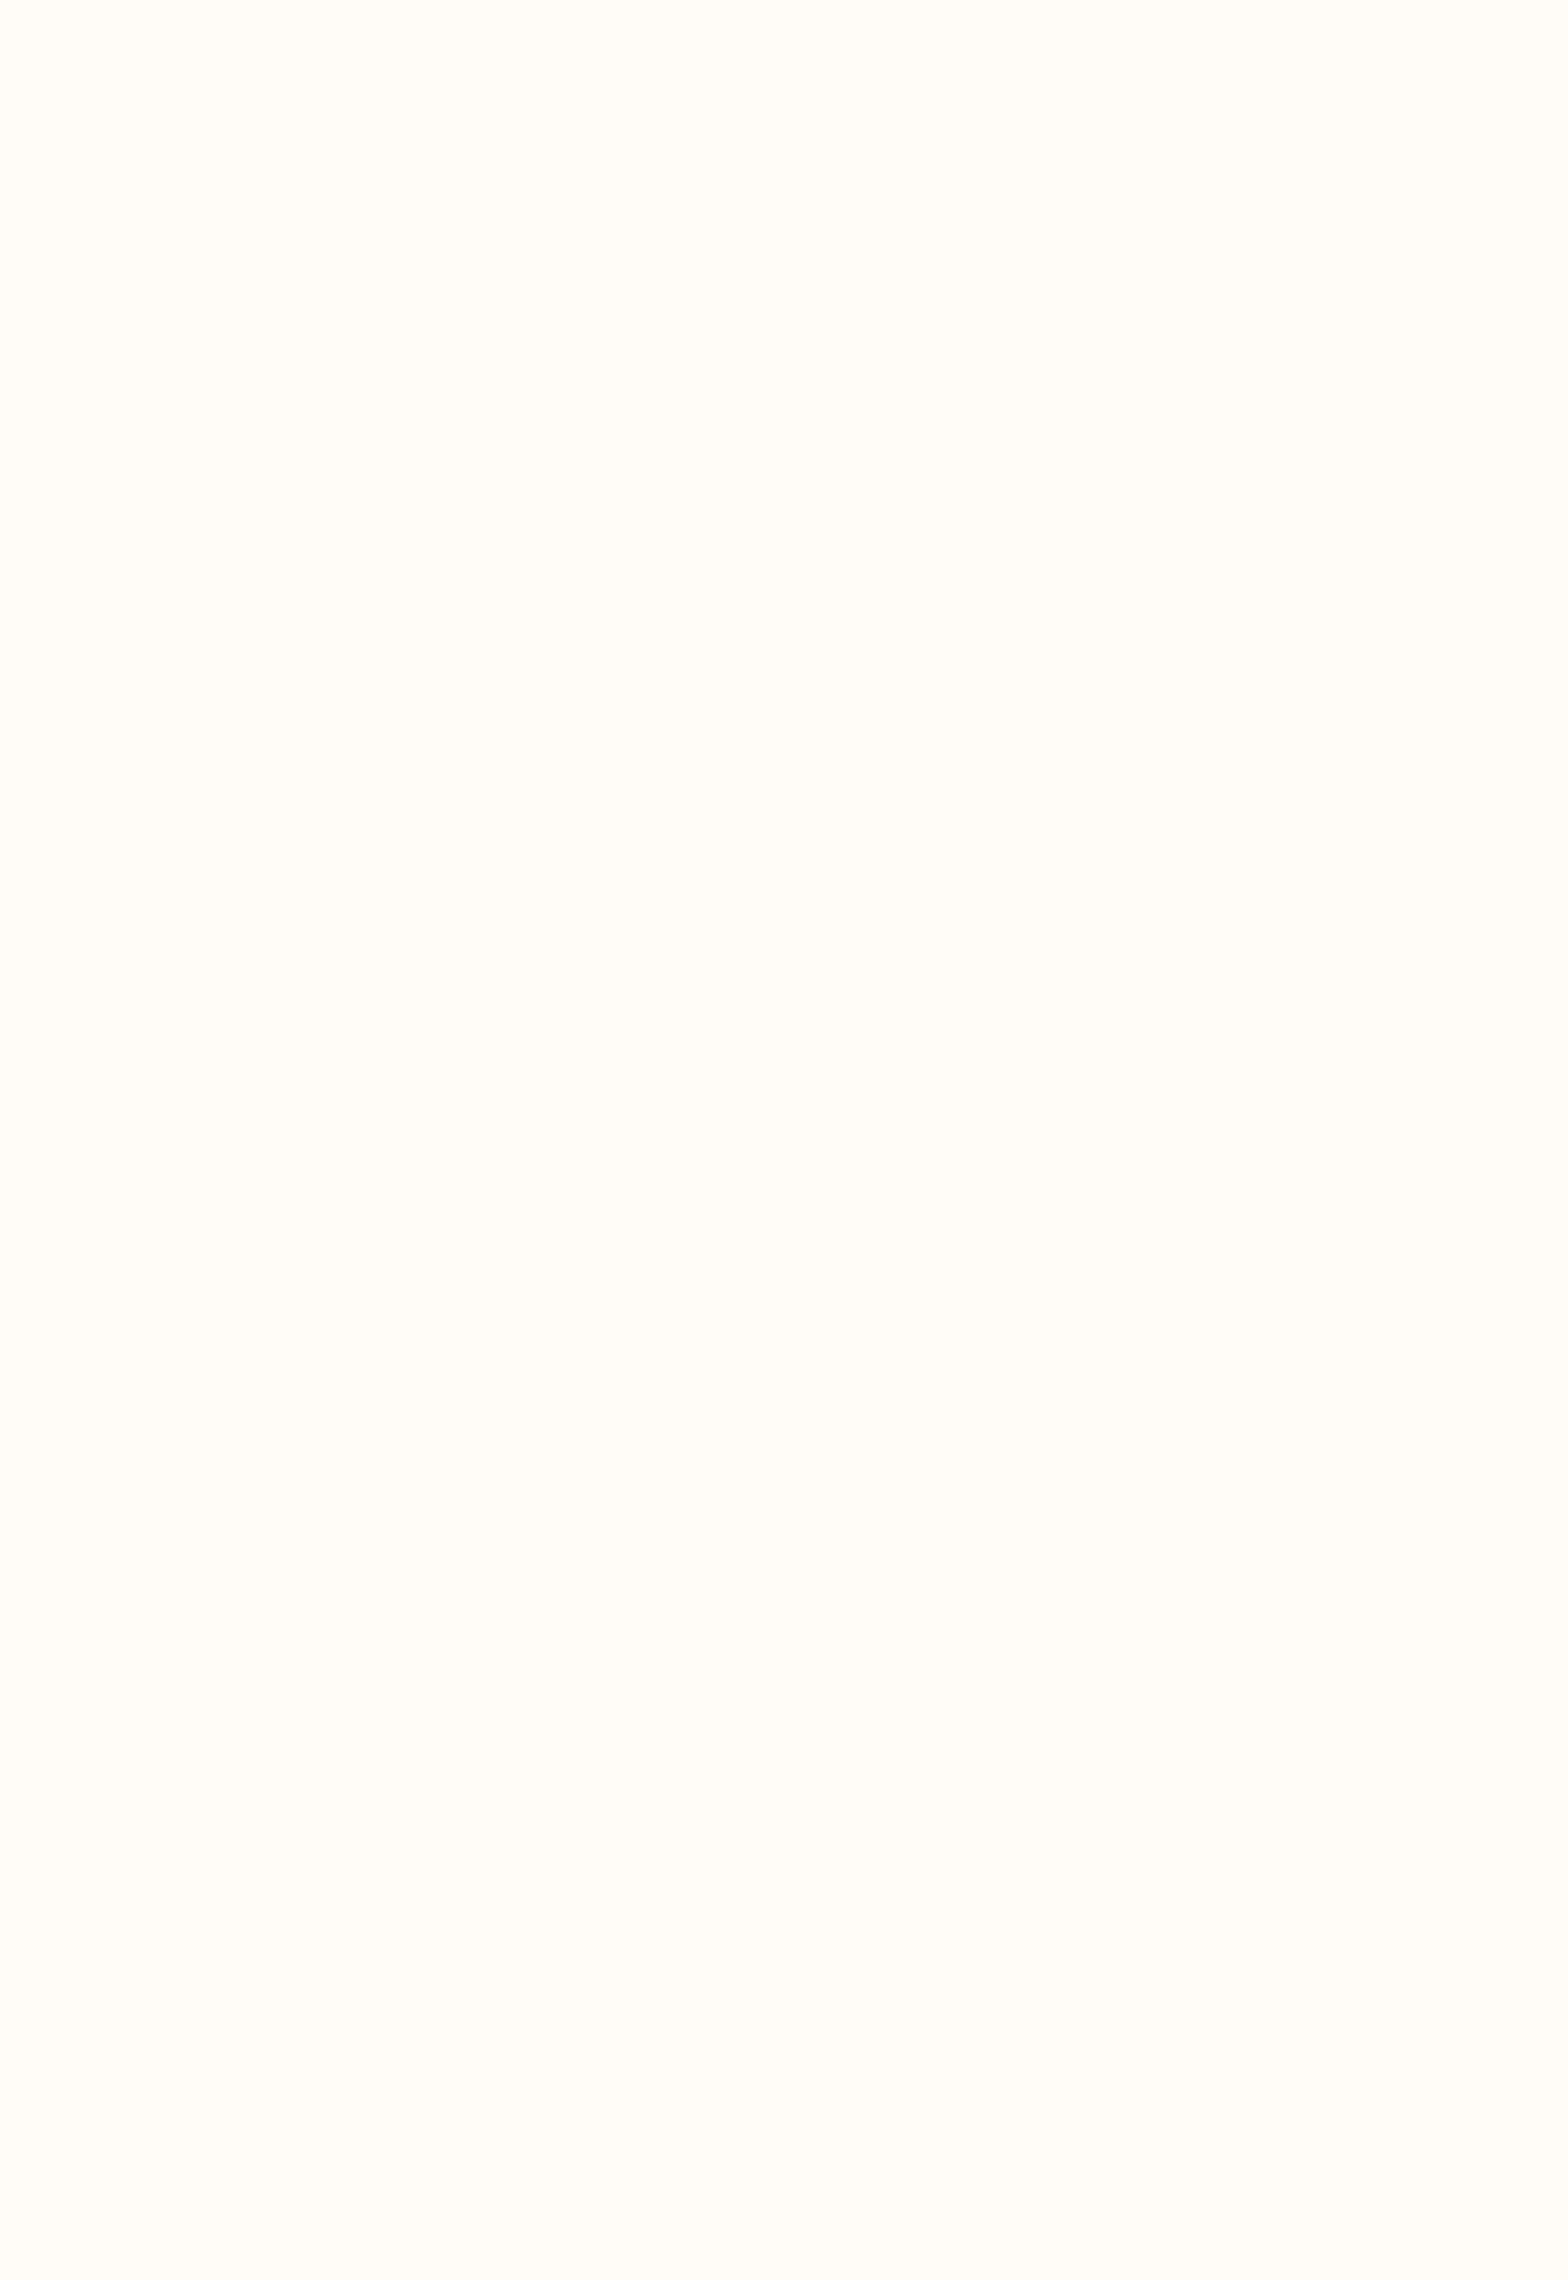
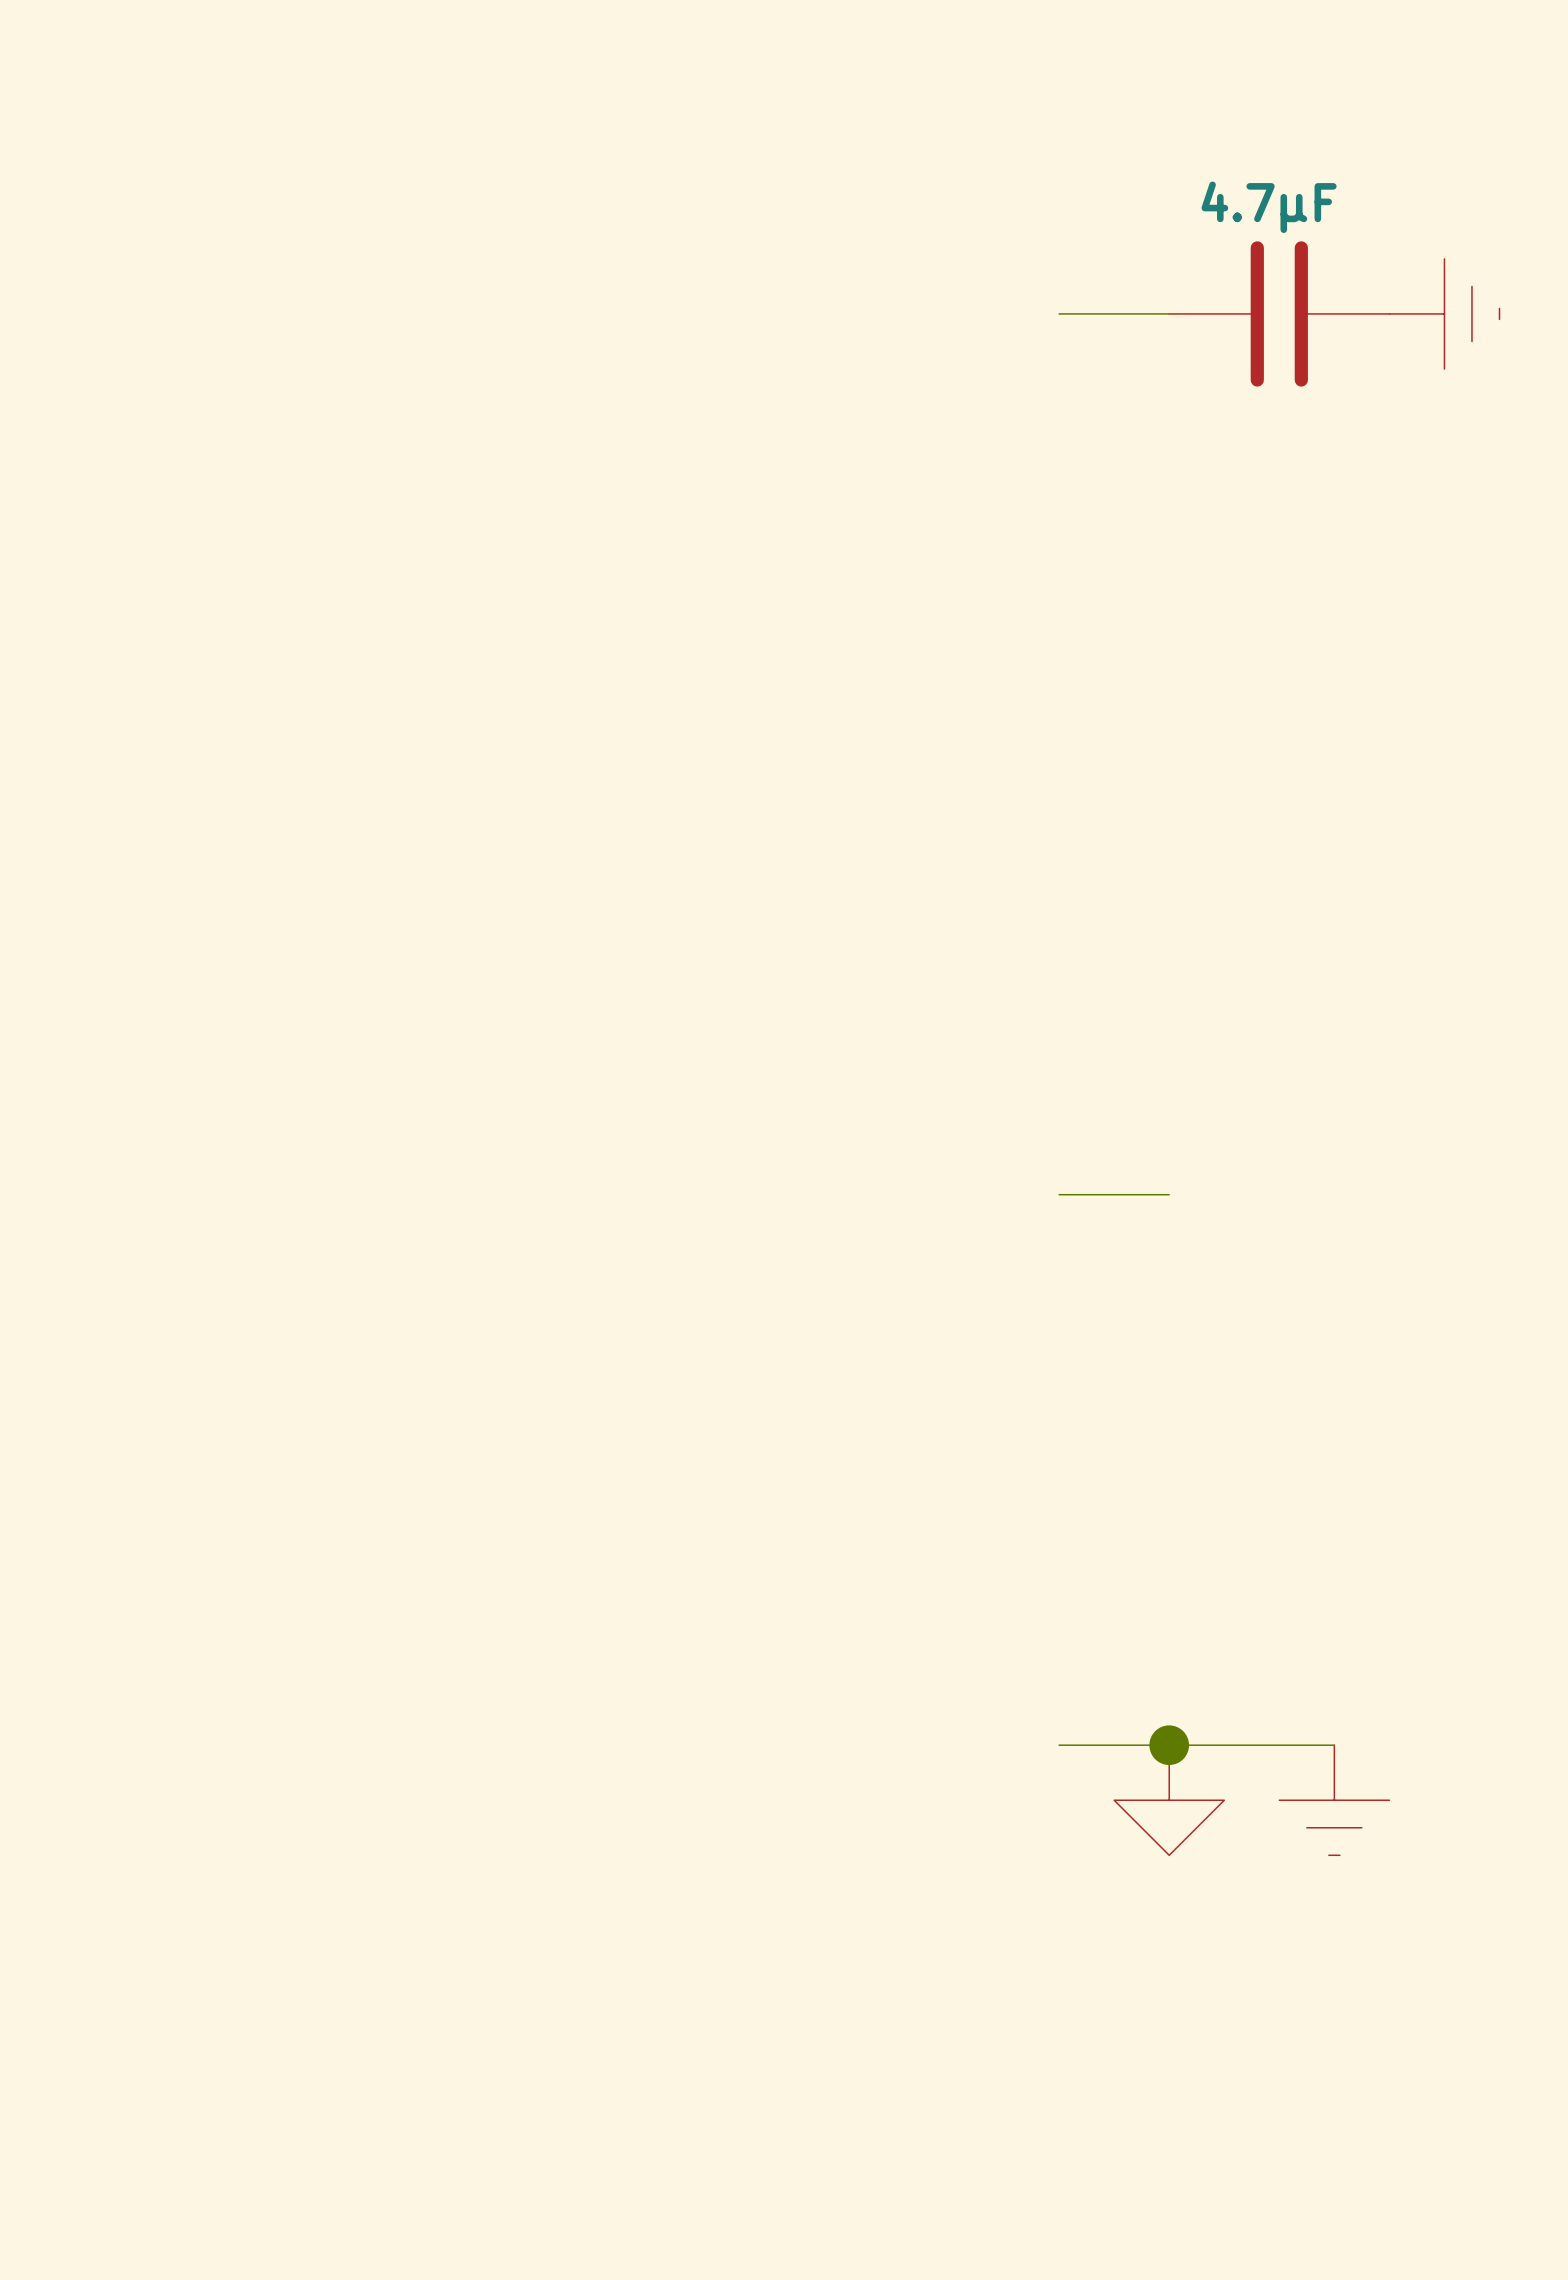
wire: none -> (1059, 313) (1169, 313)
part: none -> 4.7µF (1279, 313)
power symbol: none -> (1444, 313)
wire: none -> (1059, 1194) (1169, 1194)
wire: none -> (1059, 1745) (1334, 1745)
junction: none -> (1169, 1745)
power symbol: none -> (1169, 1800)
power symbol: none -> (1334, 1800)

